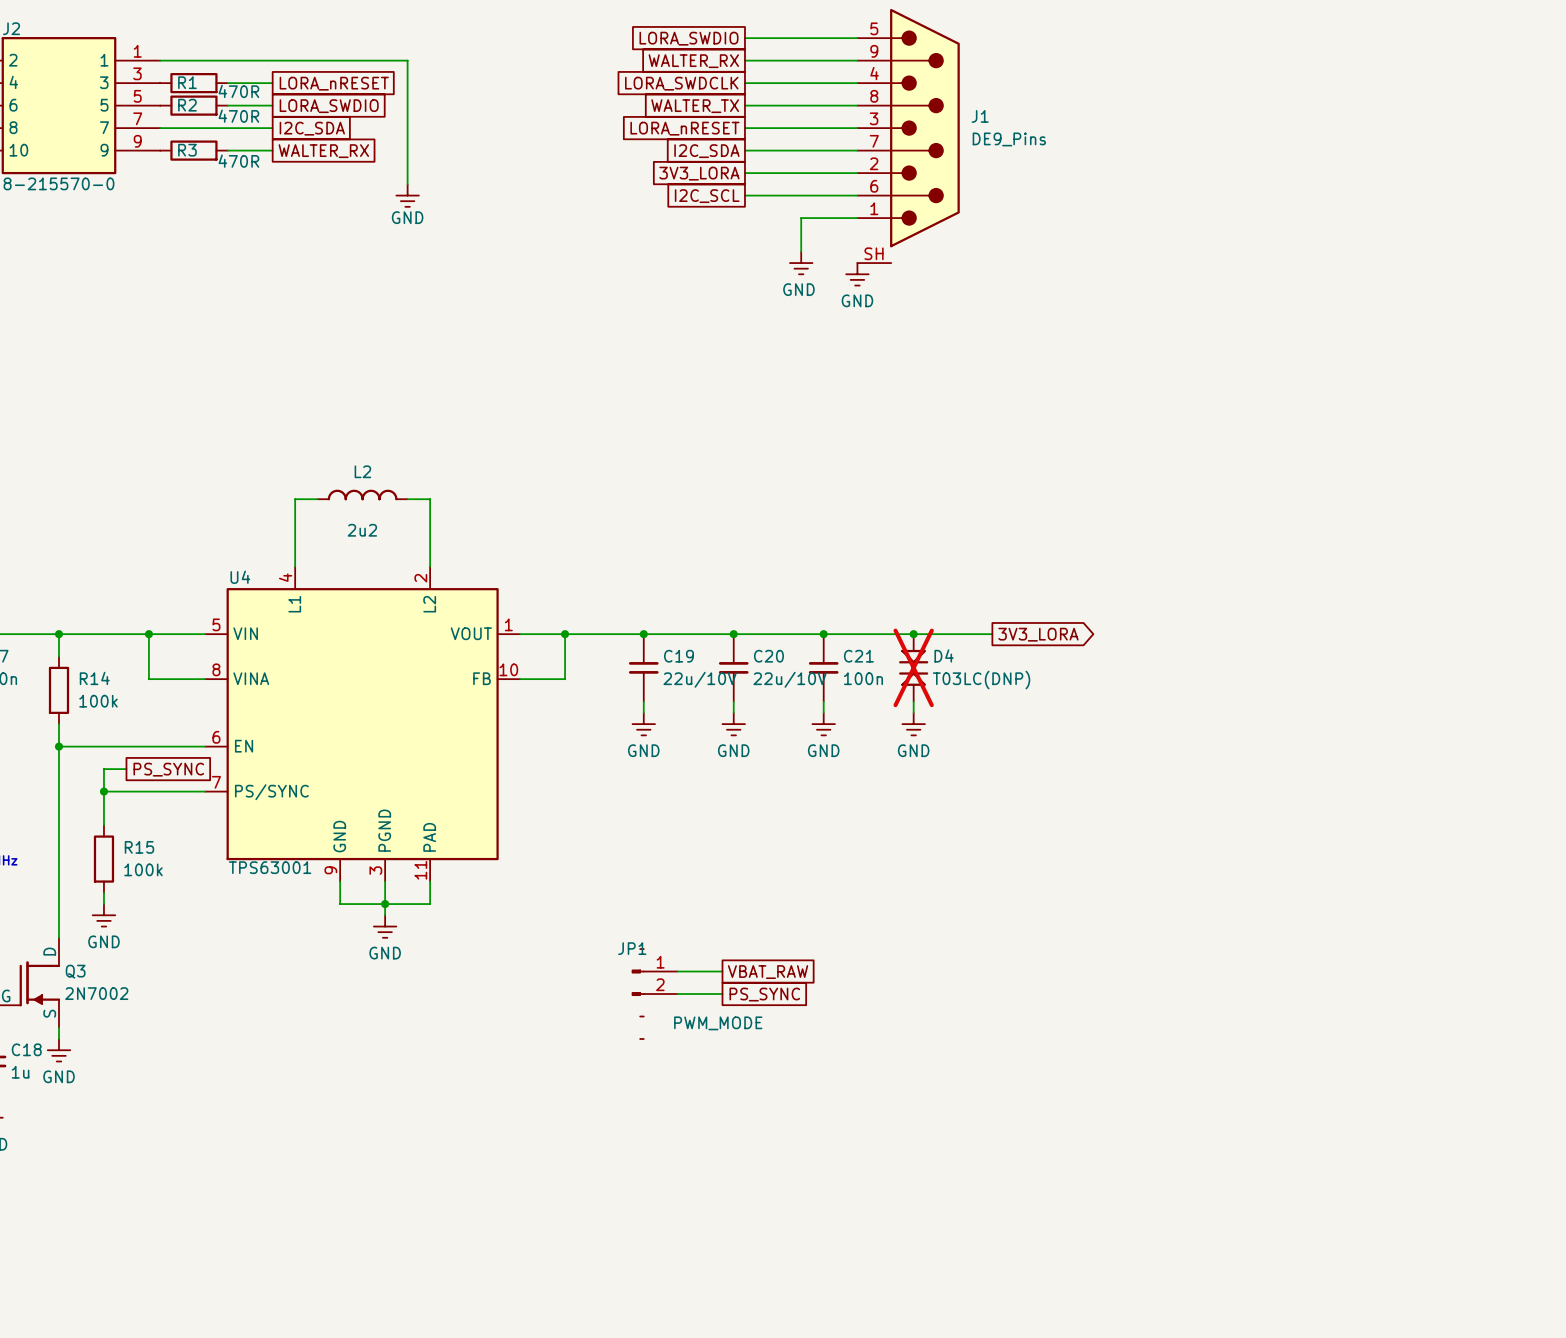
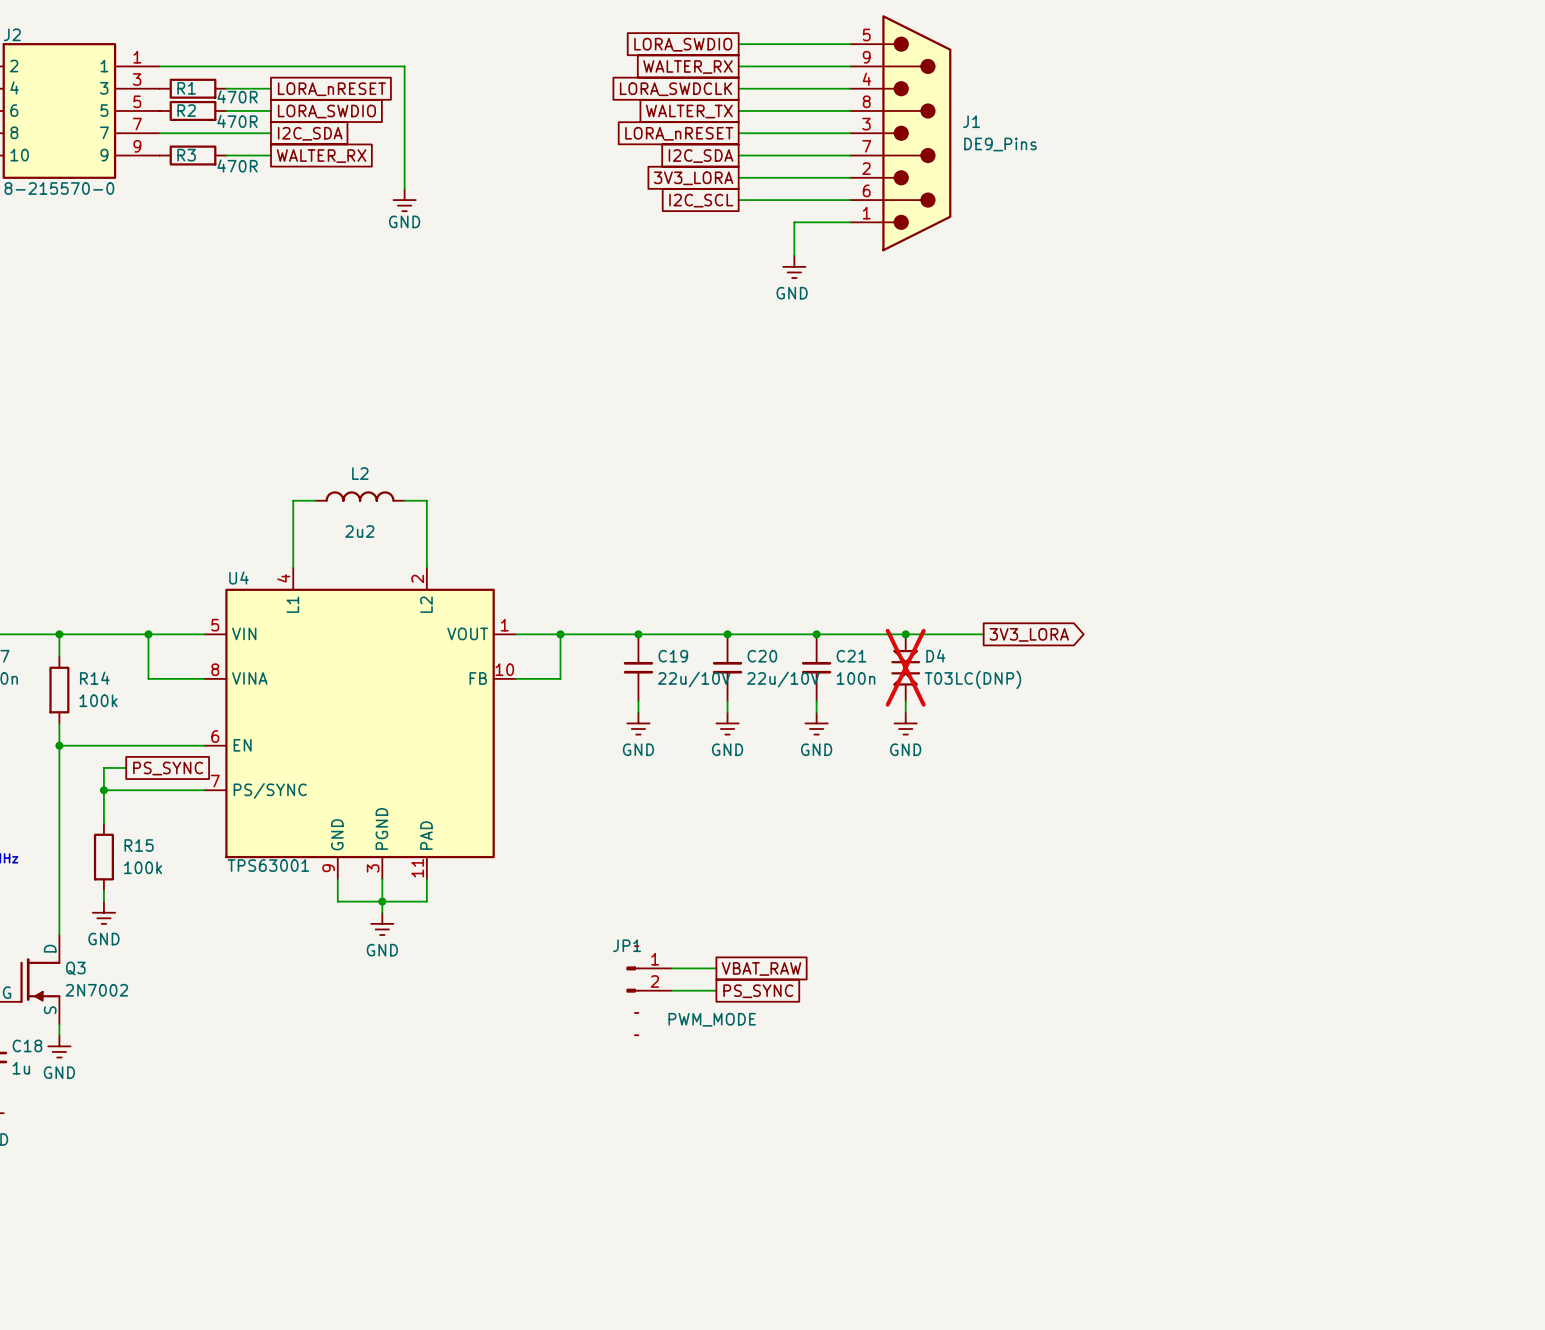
J1 symbol: [857, 8, 960, 264] -> [850, 15, 952, 252]
power symbol: GND (857, 274) -> none

